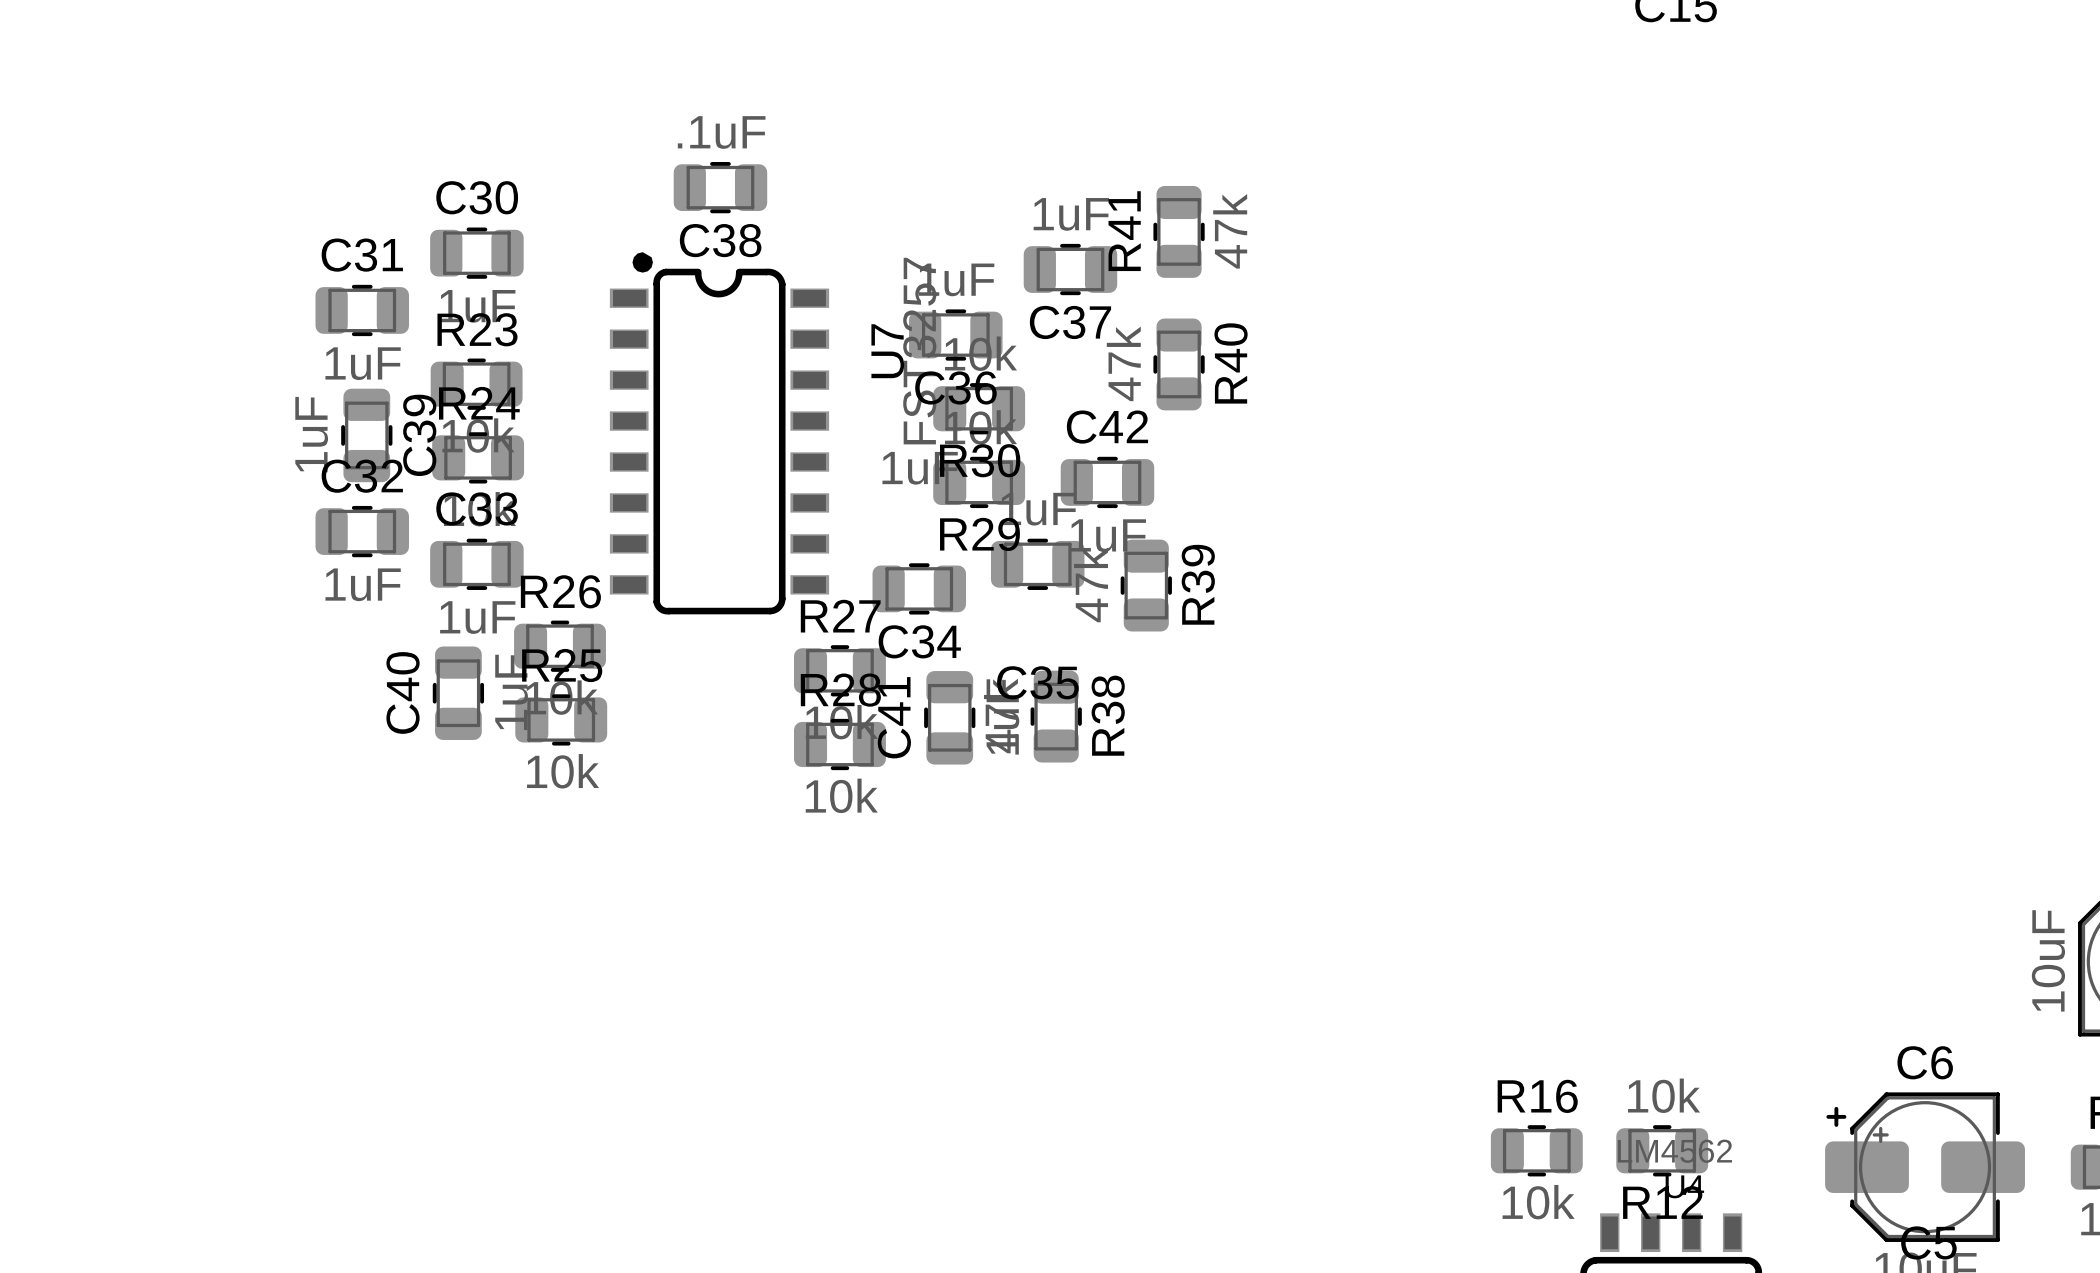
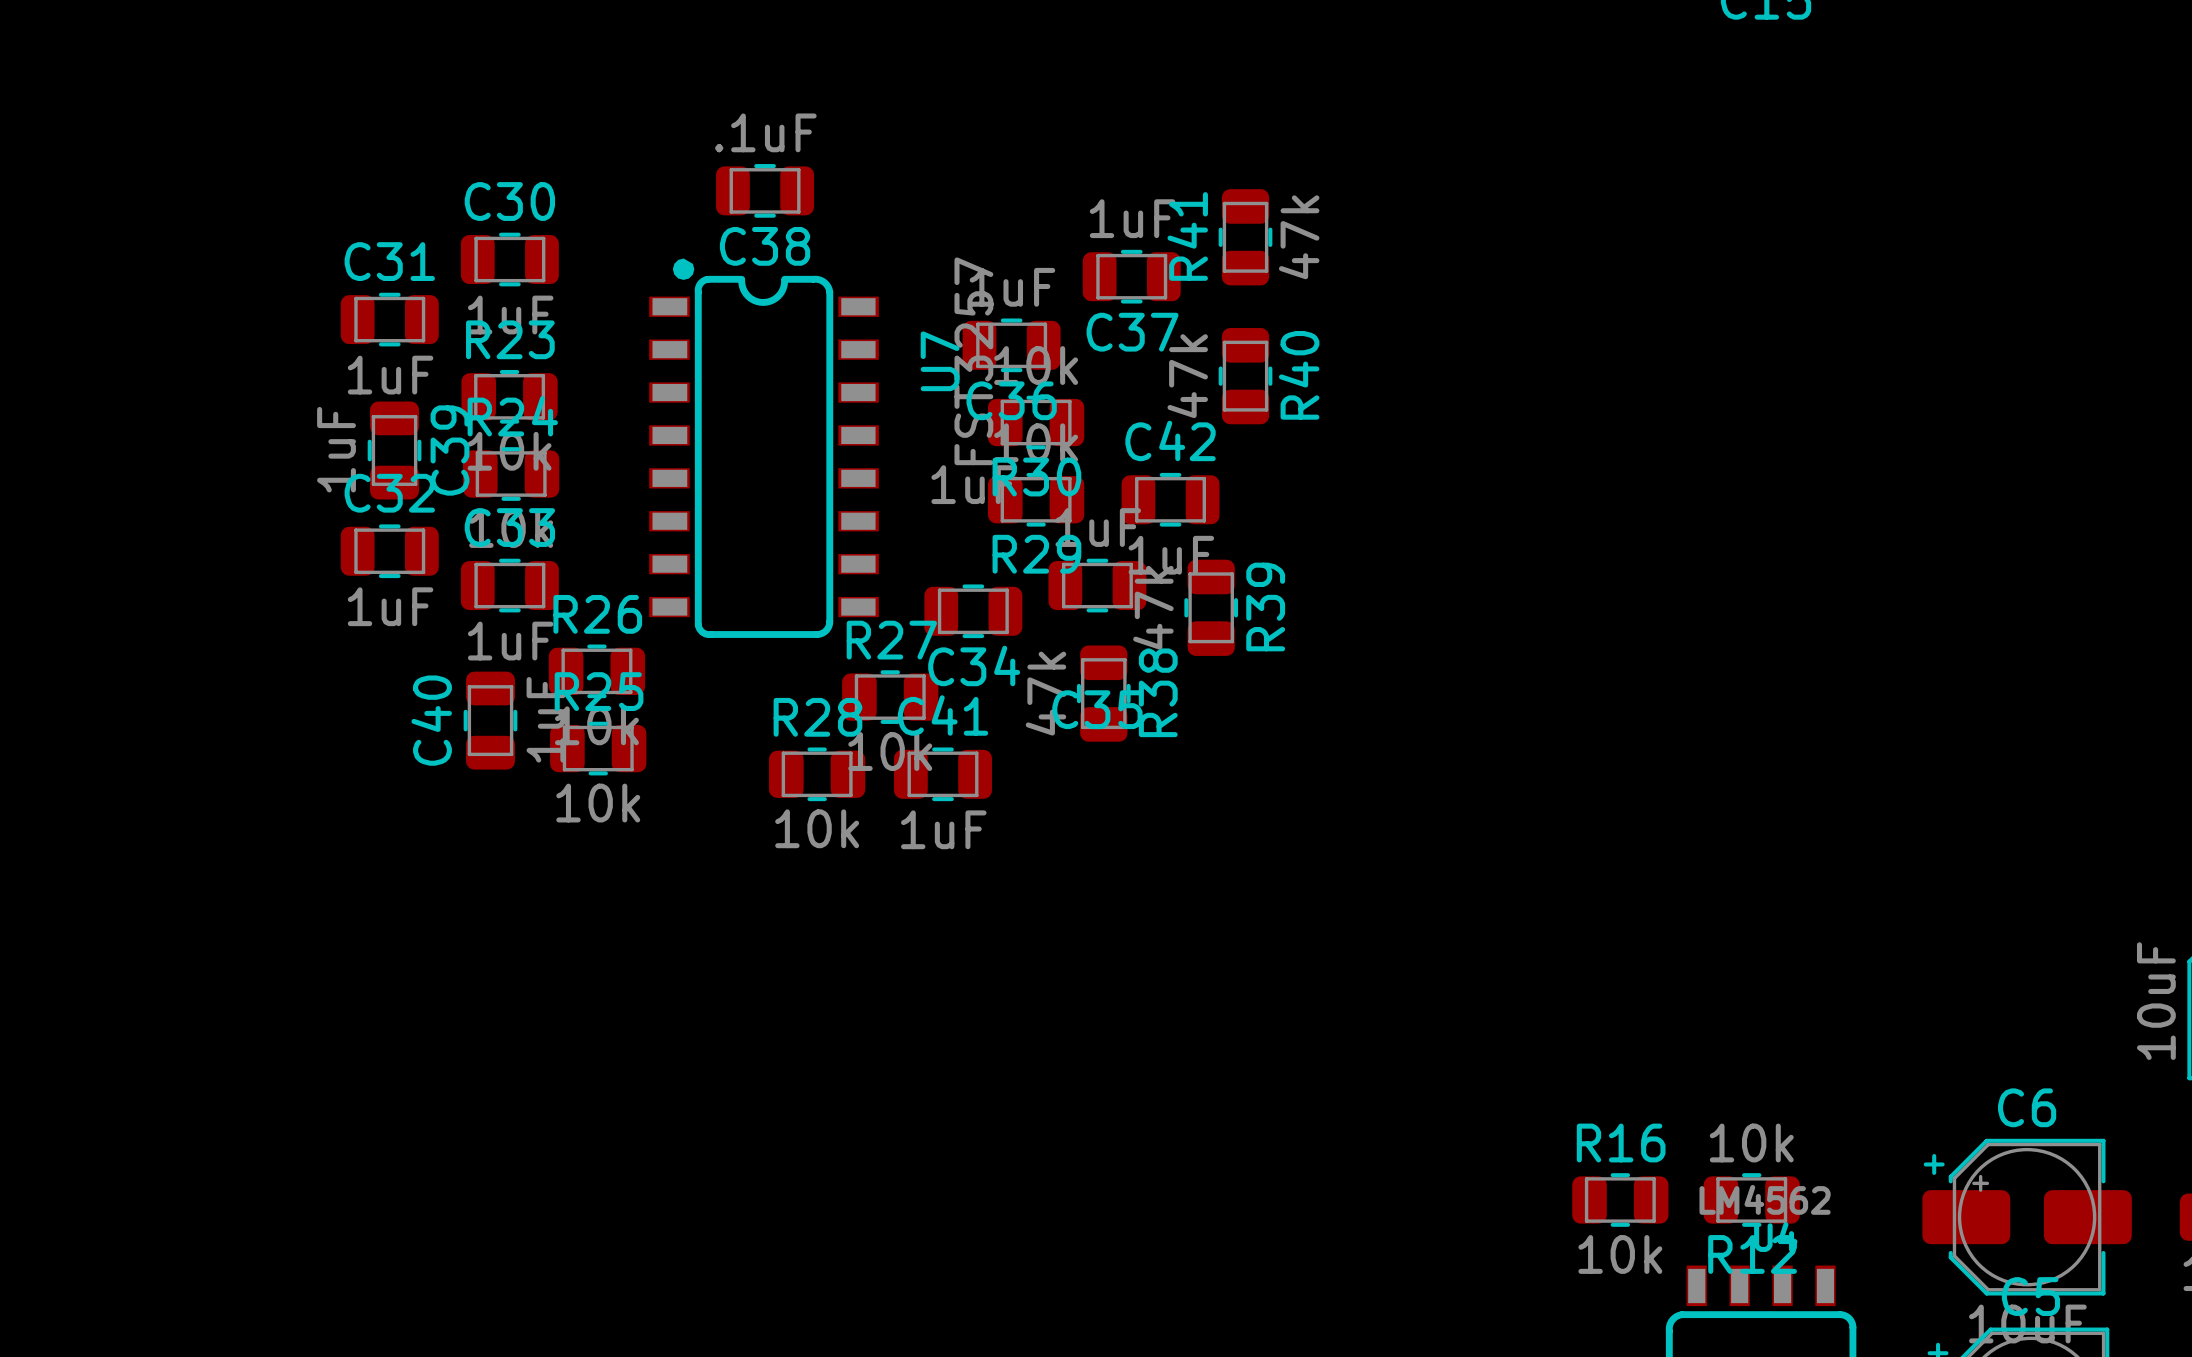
R38 position: (1056, 716) -> (1103, 693)
C41 rotation: 0° (949, 717) -> 90° clockwise (943, 774)
C41 position: (949, 717) -> (943, 774)
R28 position: (839, 744) -> (817, 774)

